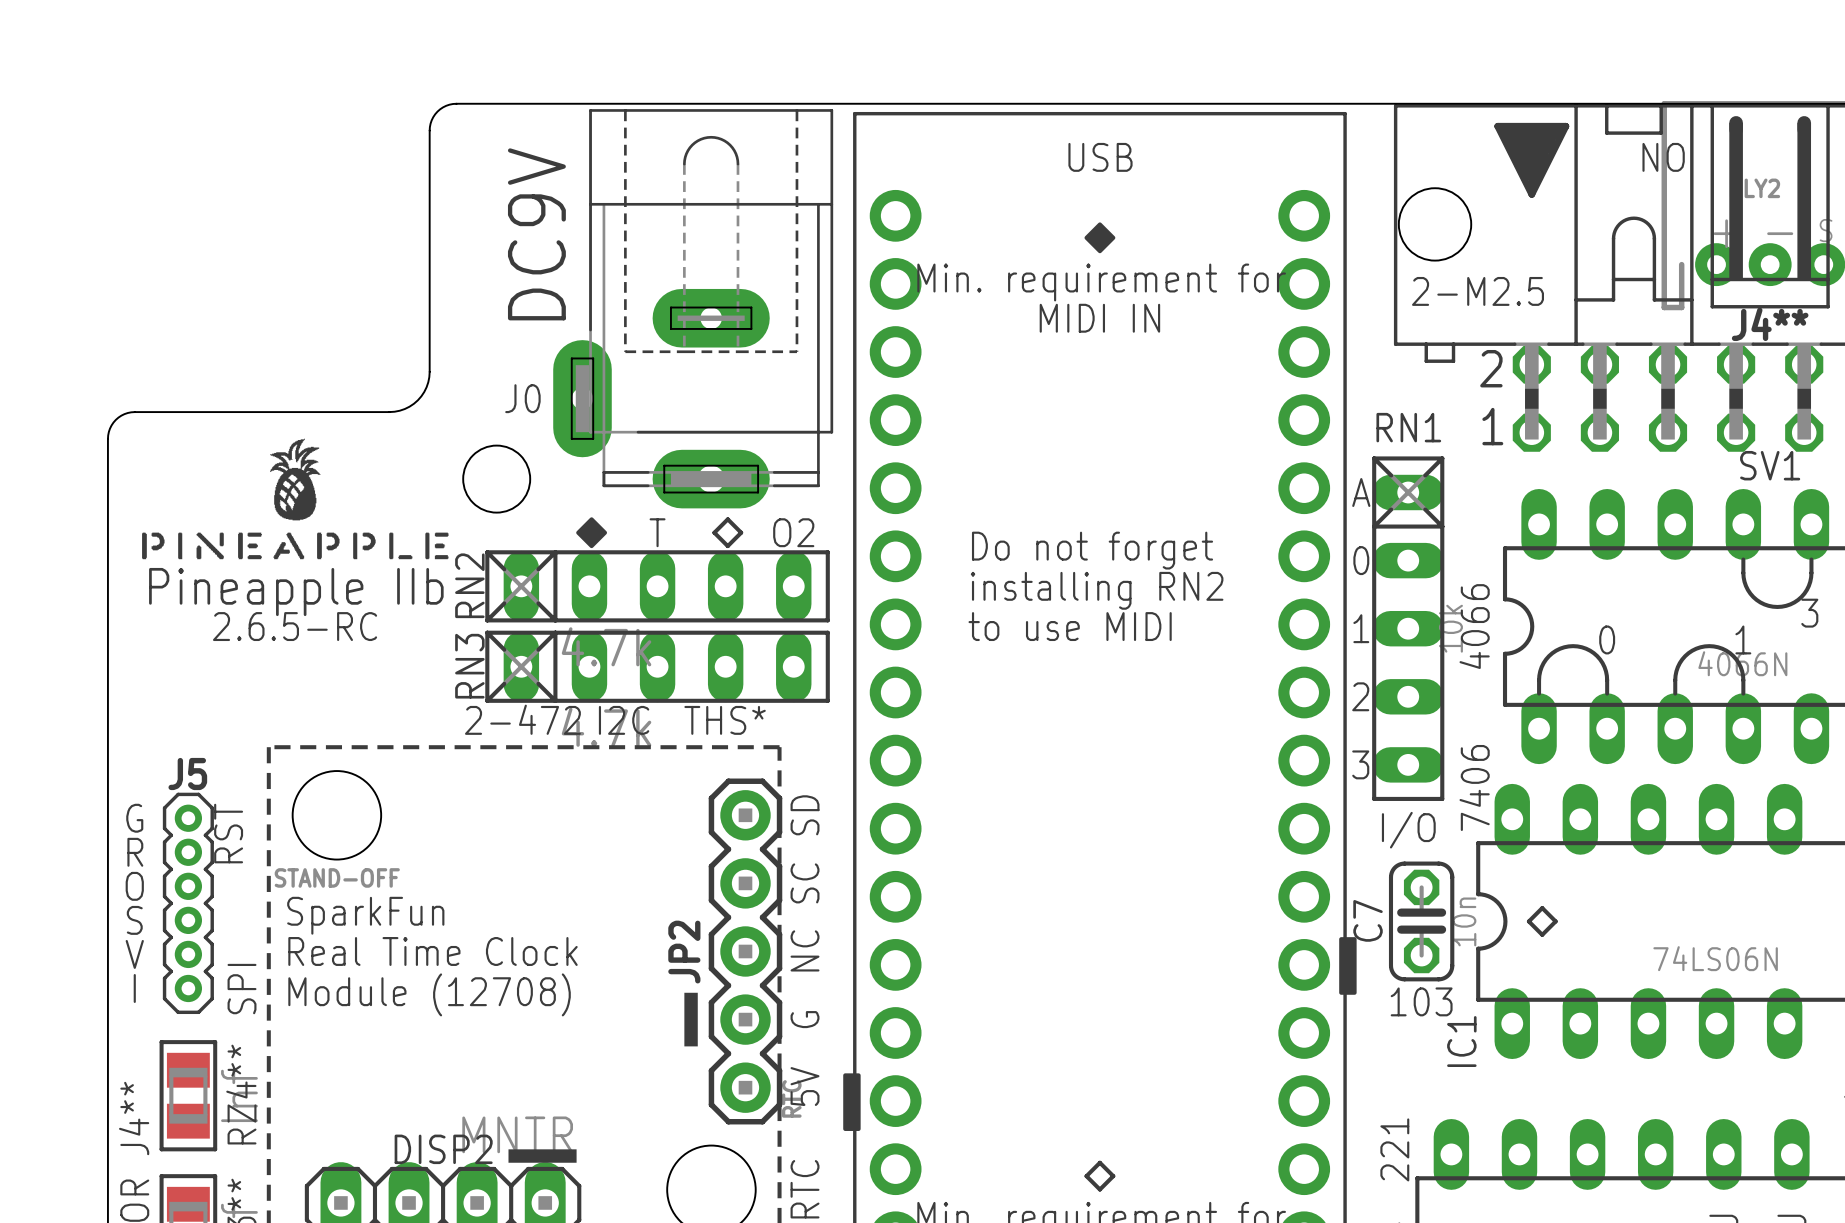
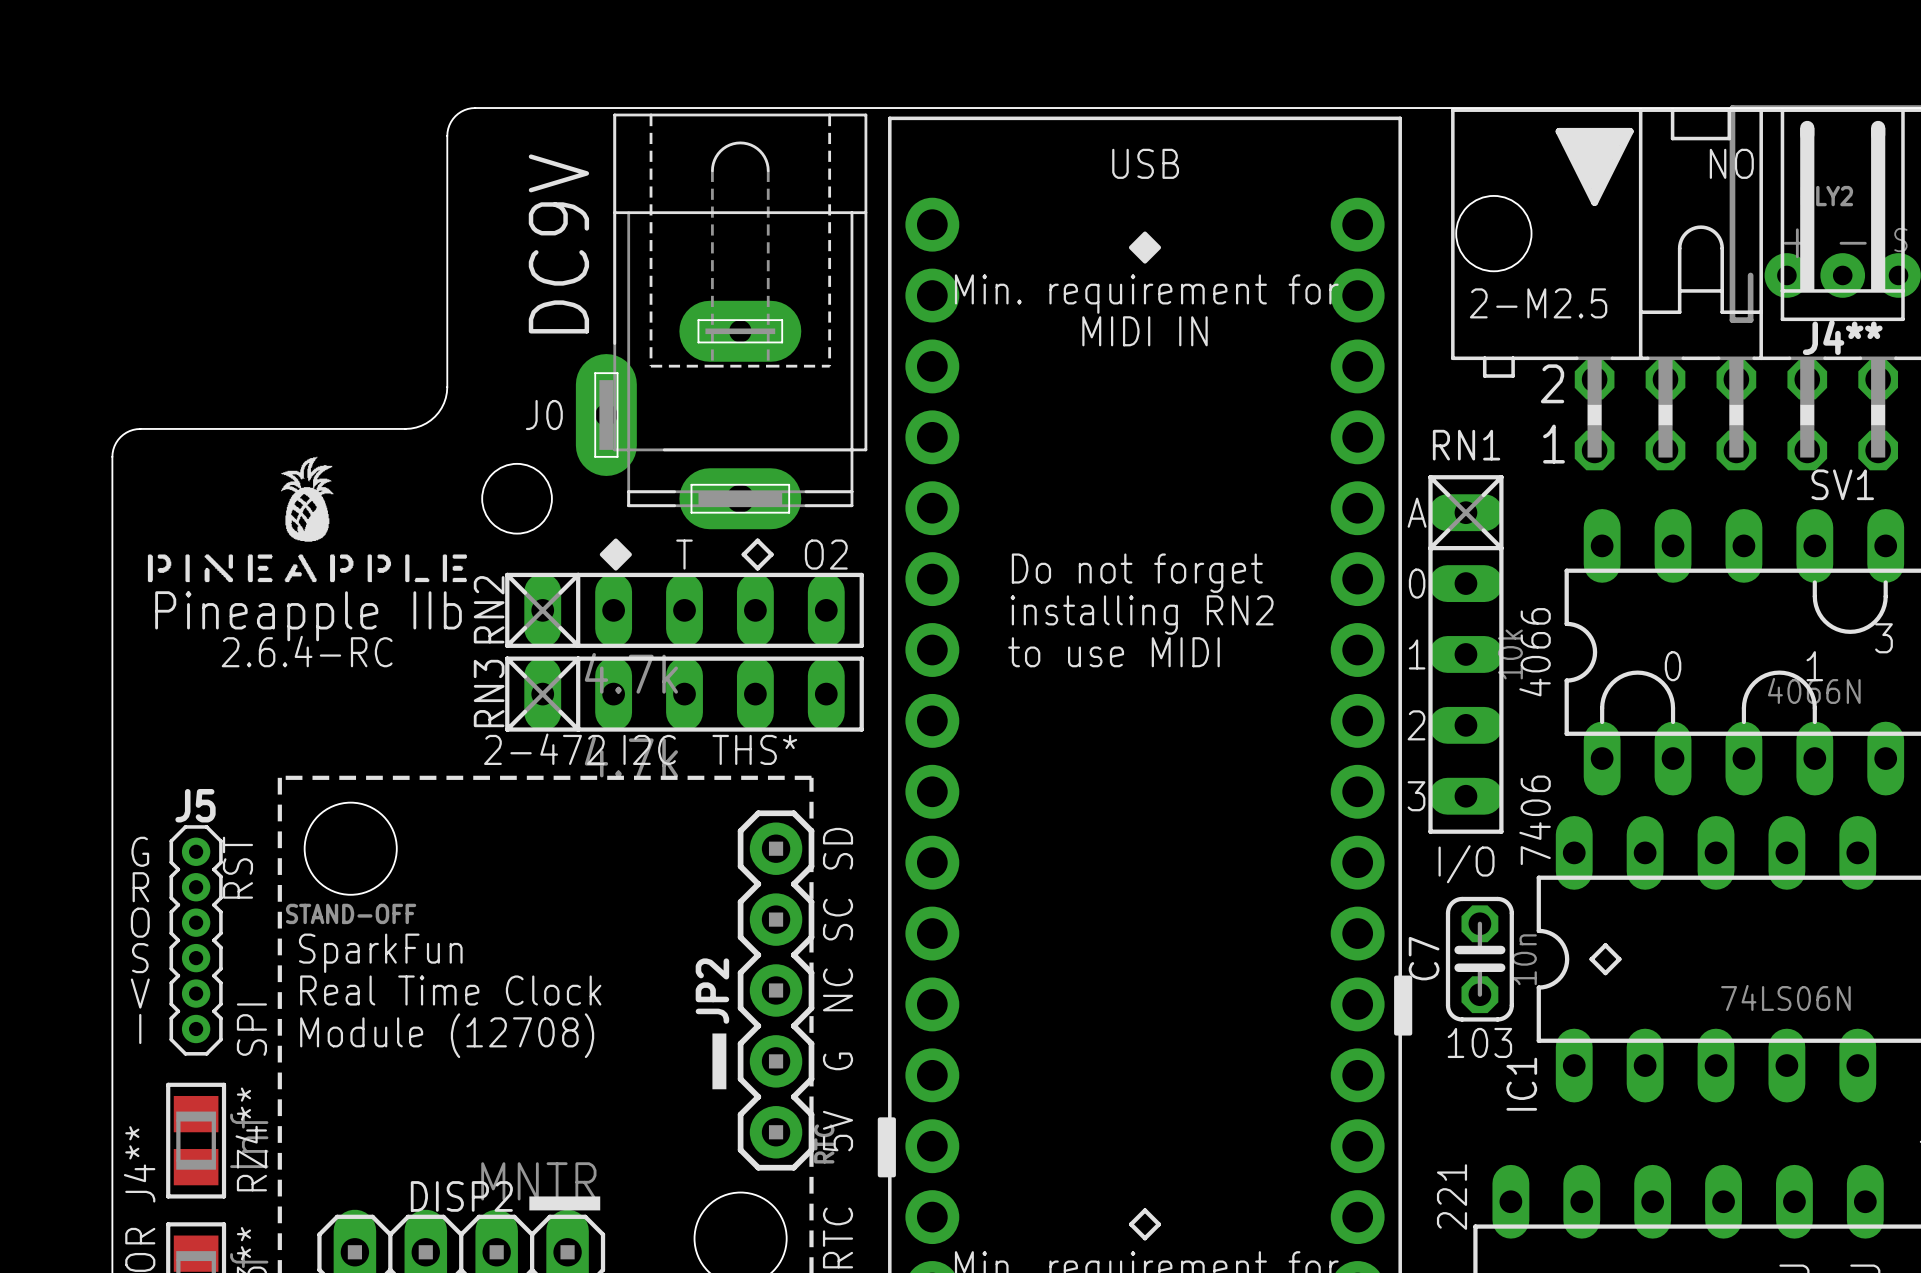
text: 2.6.5-RC (295, 626) -> 2.6.4-RC (307, 651)

